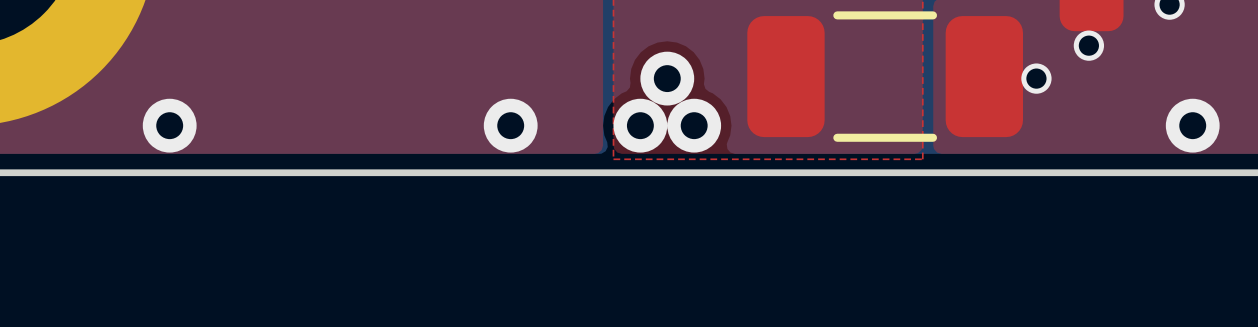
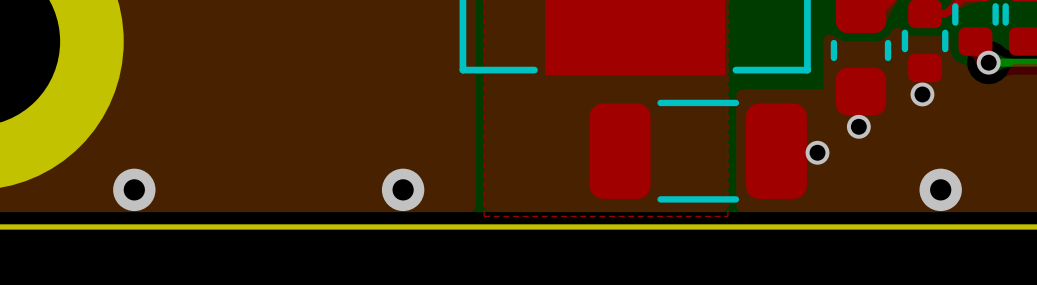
via: (667, 78) -> none
via: (640, 125) -> none
via: (694, 125) -> none

